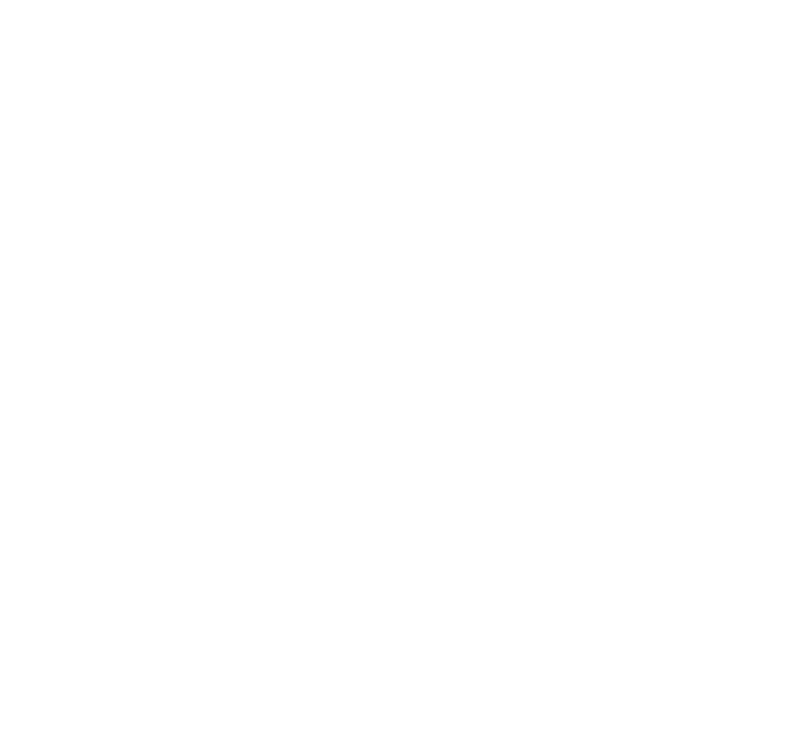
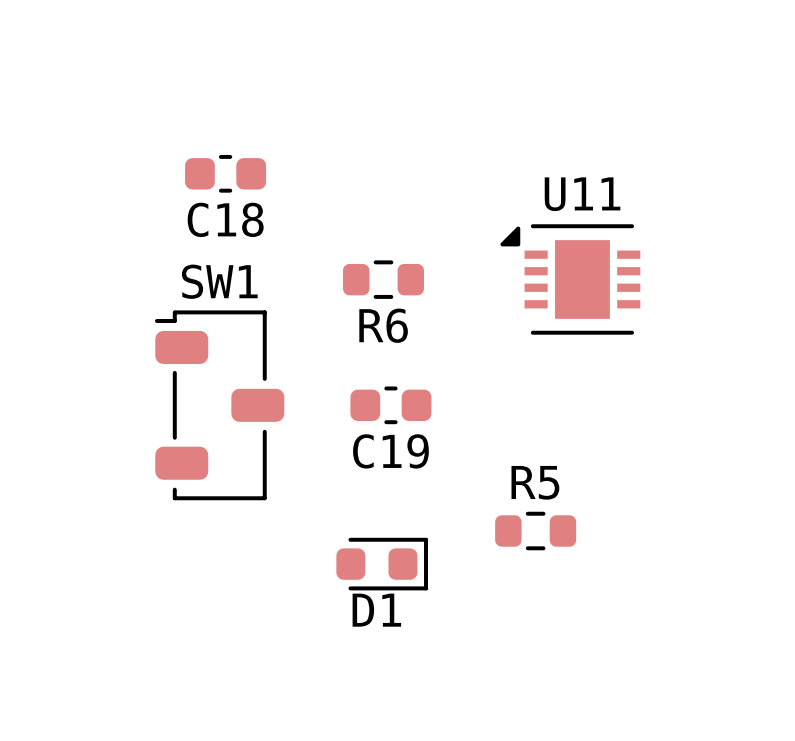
C18: none -> (225, 173)
R6: none -> (383, 279)
U11: none -> (570, 279)
SW1: none -> (219, 405)
C19: none -> (390, 405)
R5: none -> (535, 531)
D1: none -> (382, 564)

